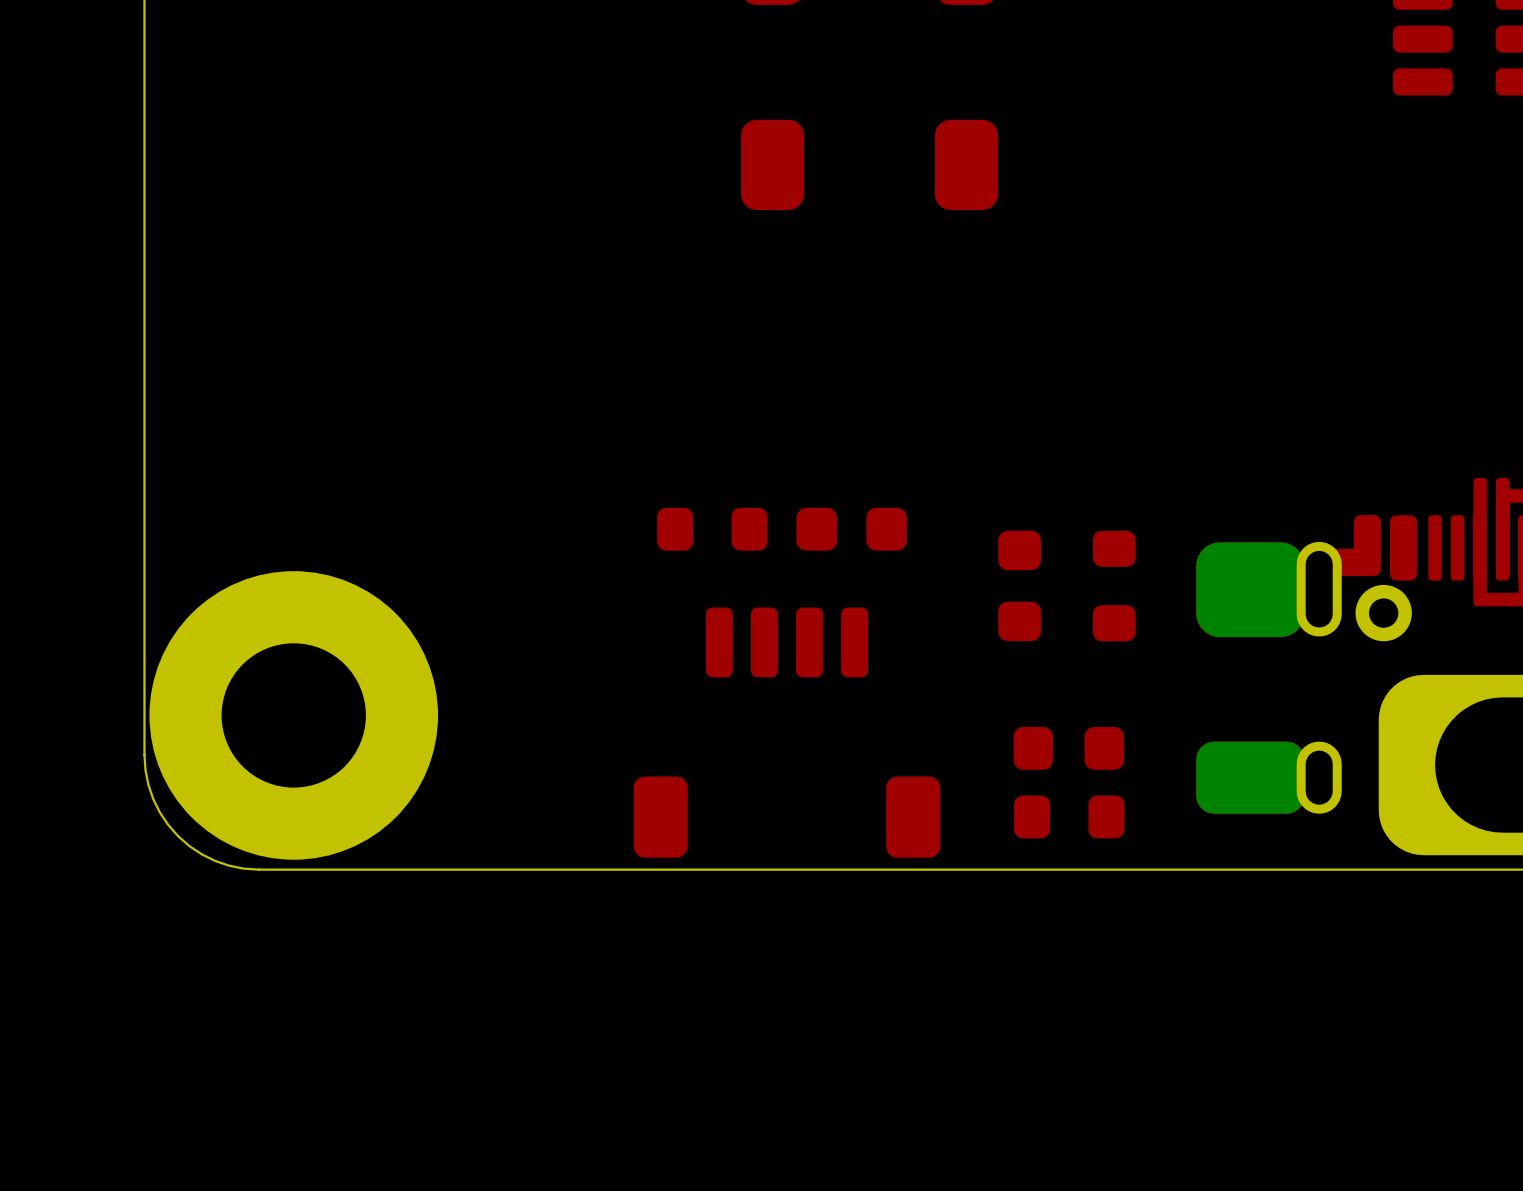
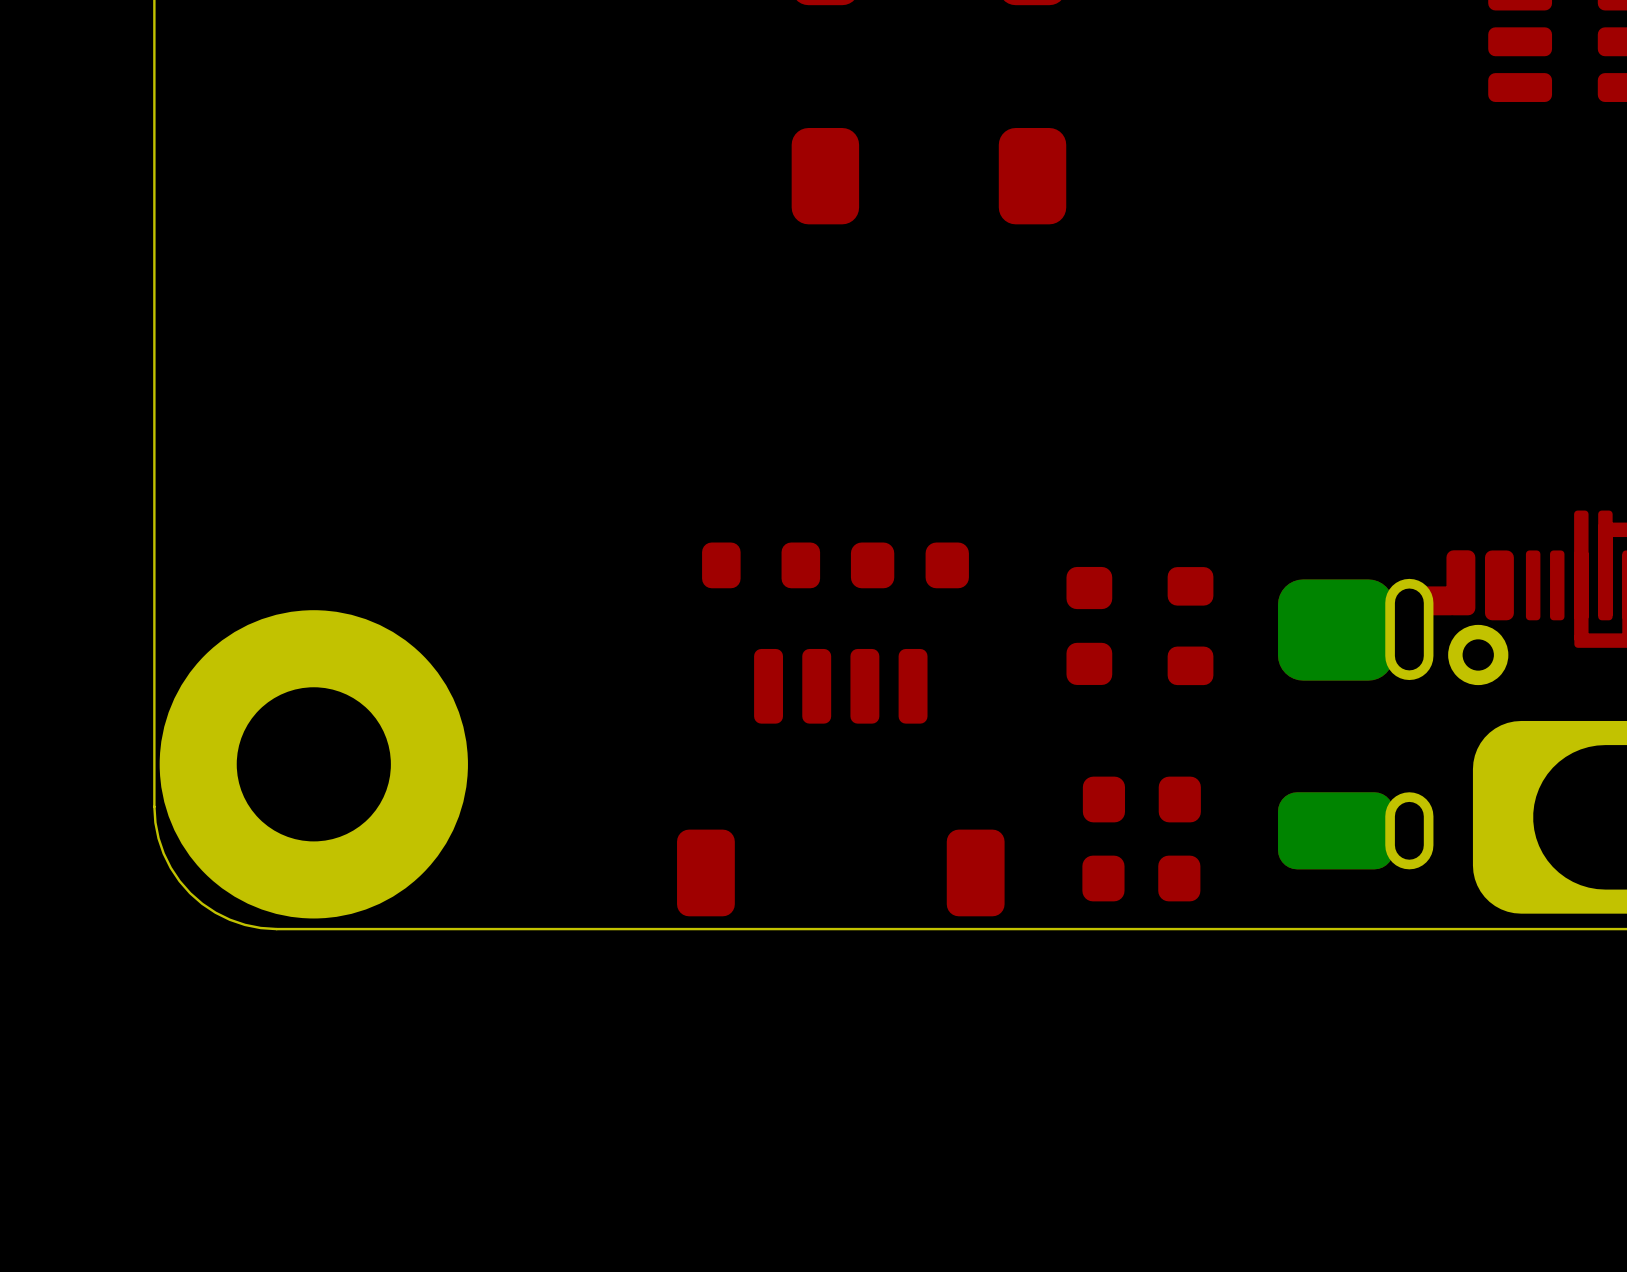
part footprint: [1014, 795, 1125, 839] -> [1082, 855, 1201, 902]

